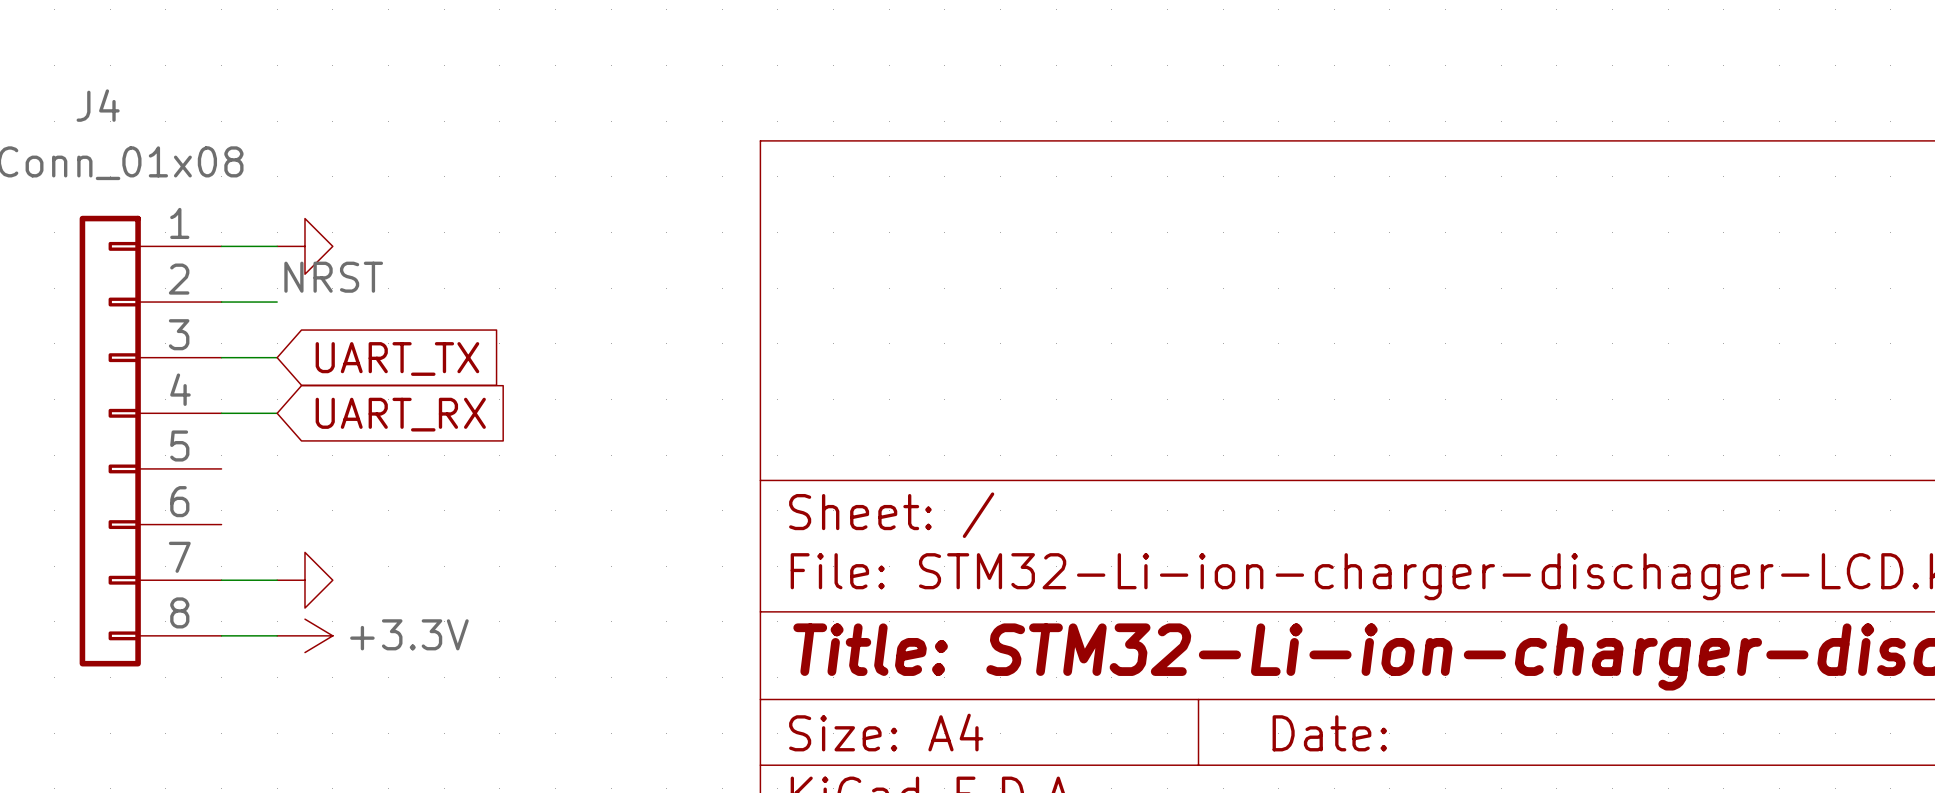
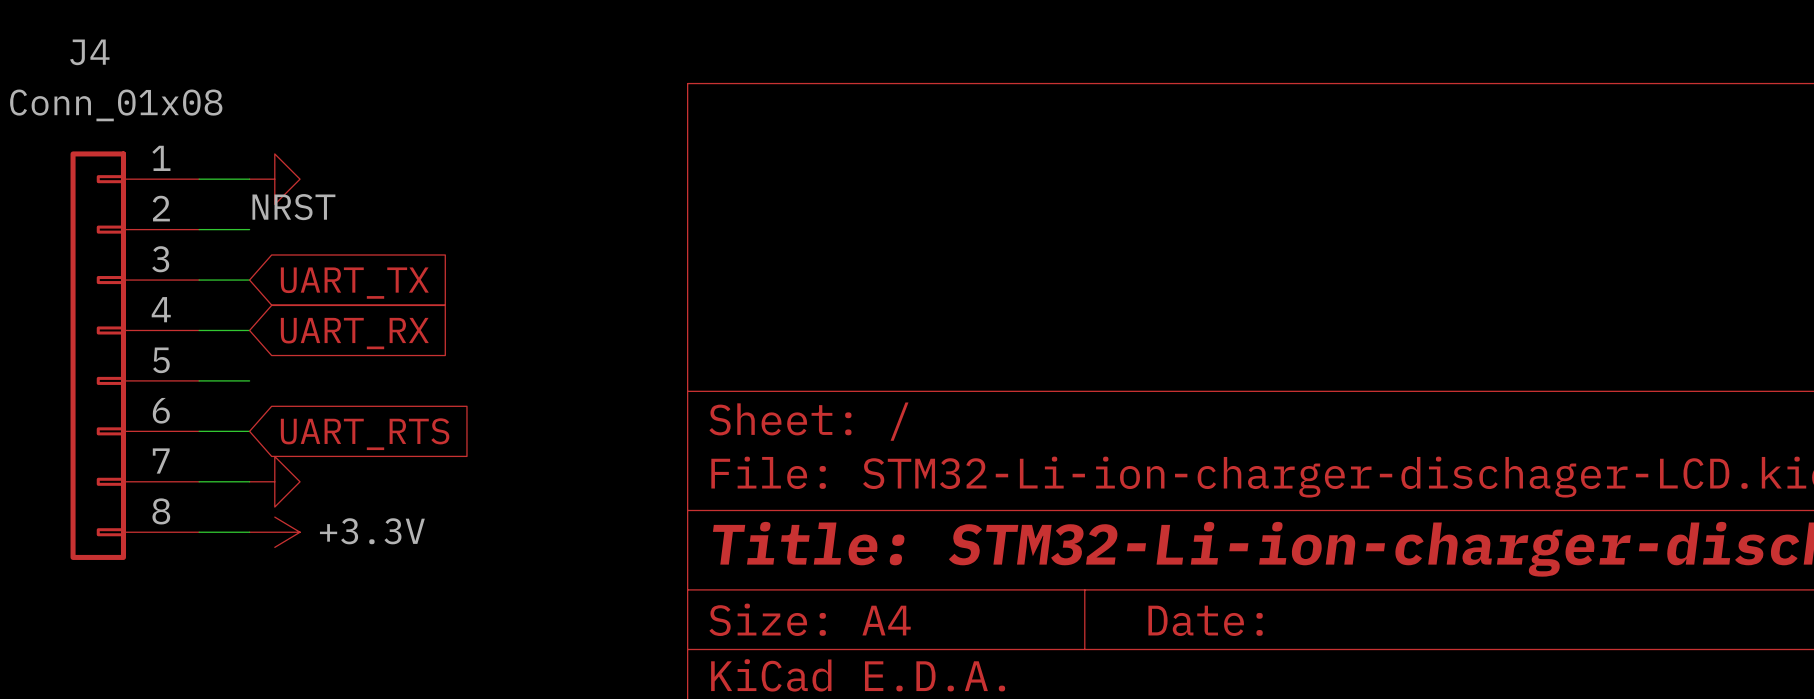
wire: none -> (199, 380) (249, 380)
wire: none -> (199, 431) (249, 431)
global label: none -> UART_RTS (365, 434)

